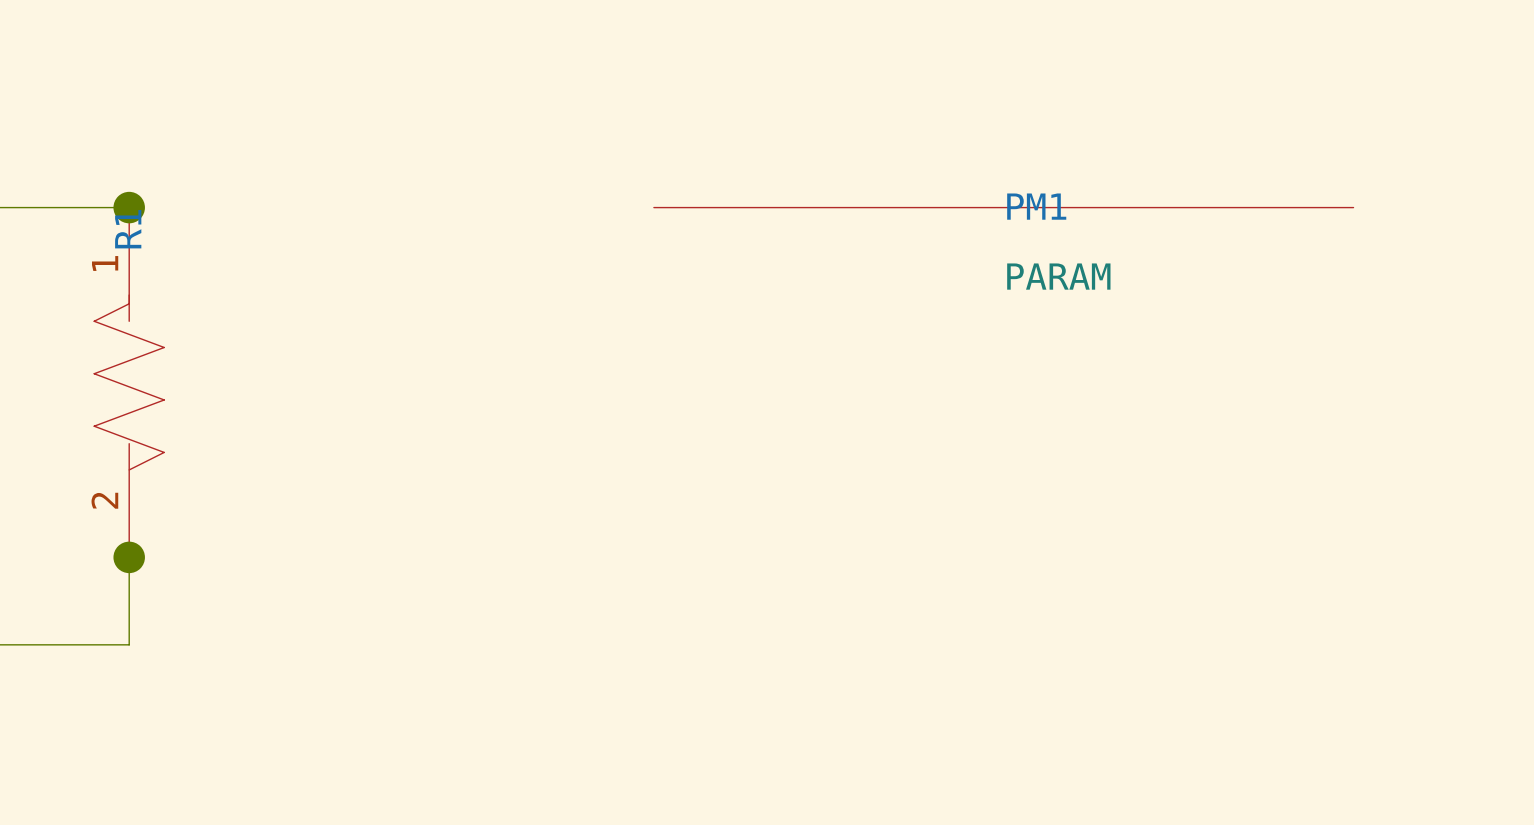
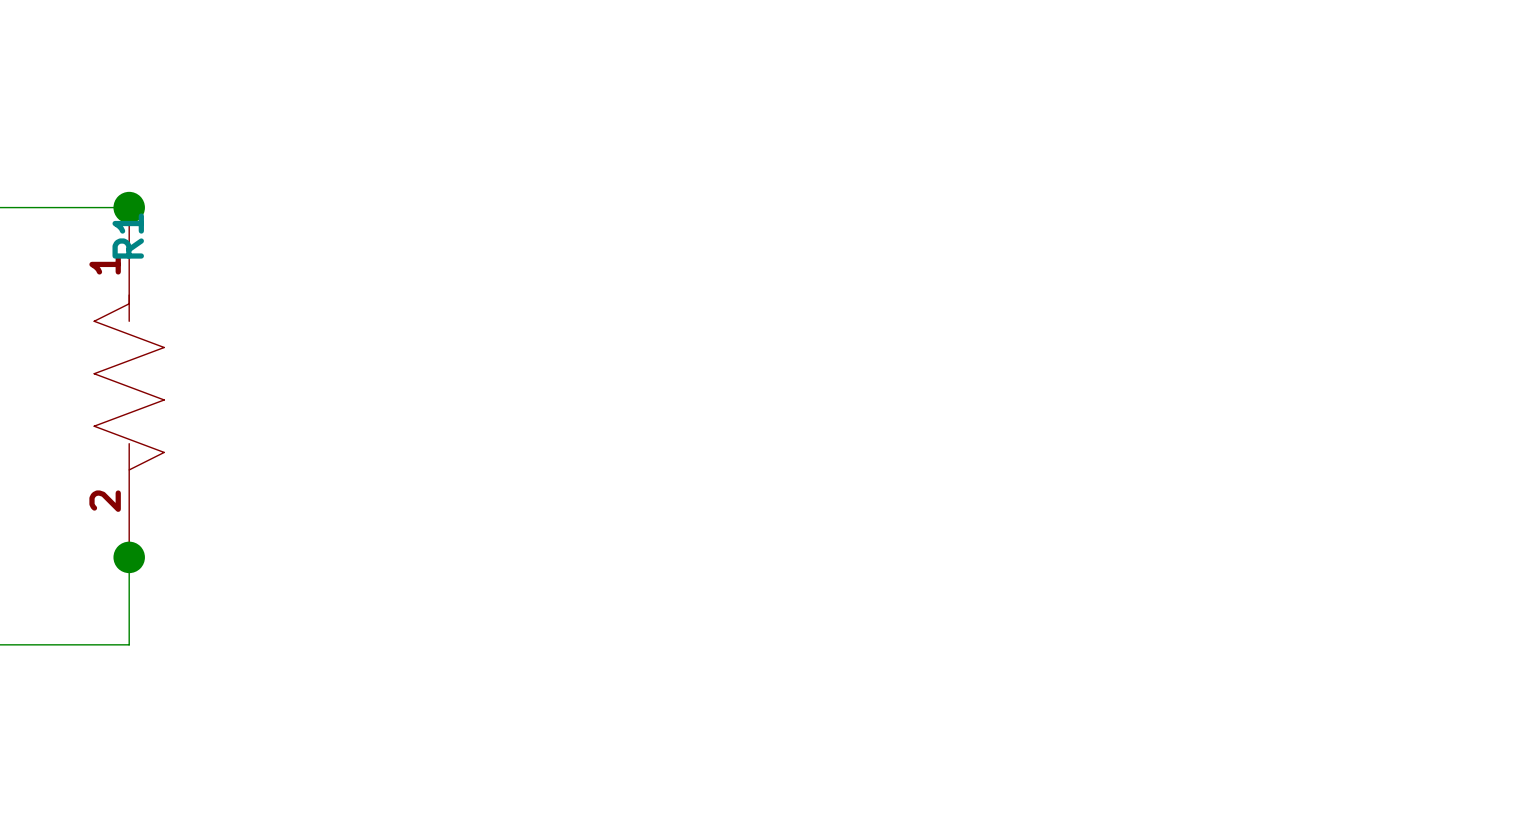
PM1: PARAM (1003, 207) -> none

